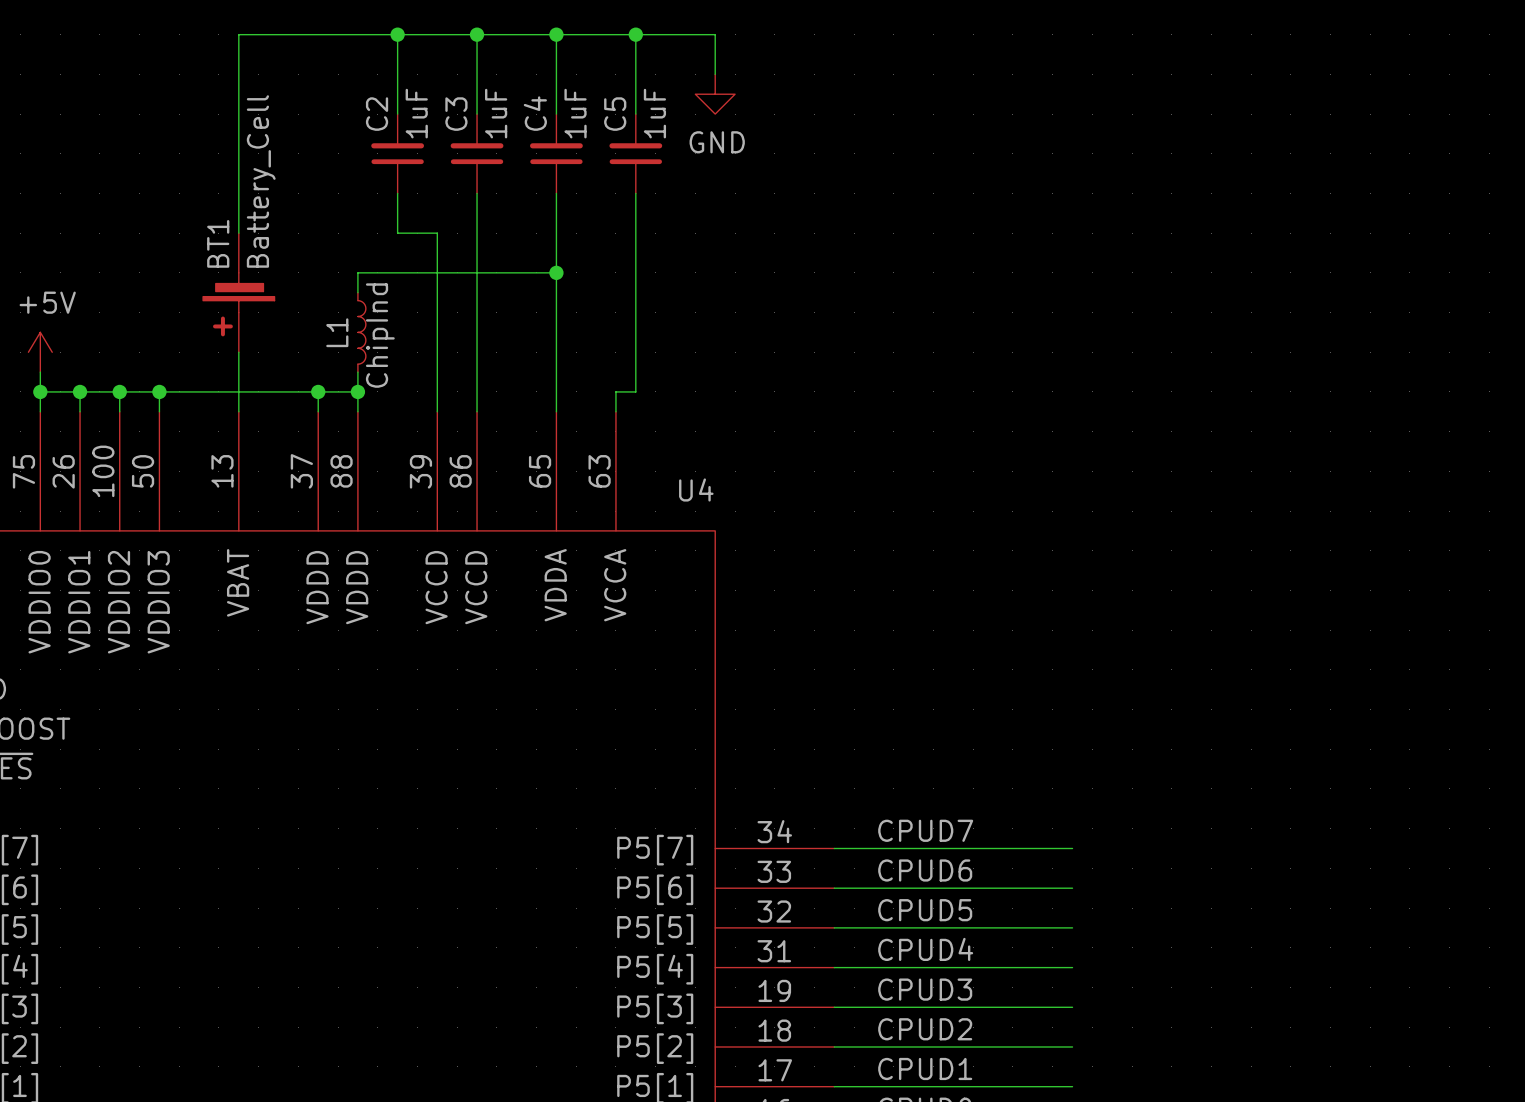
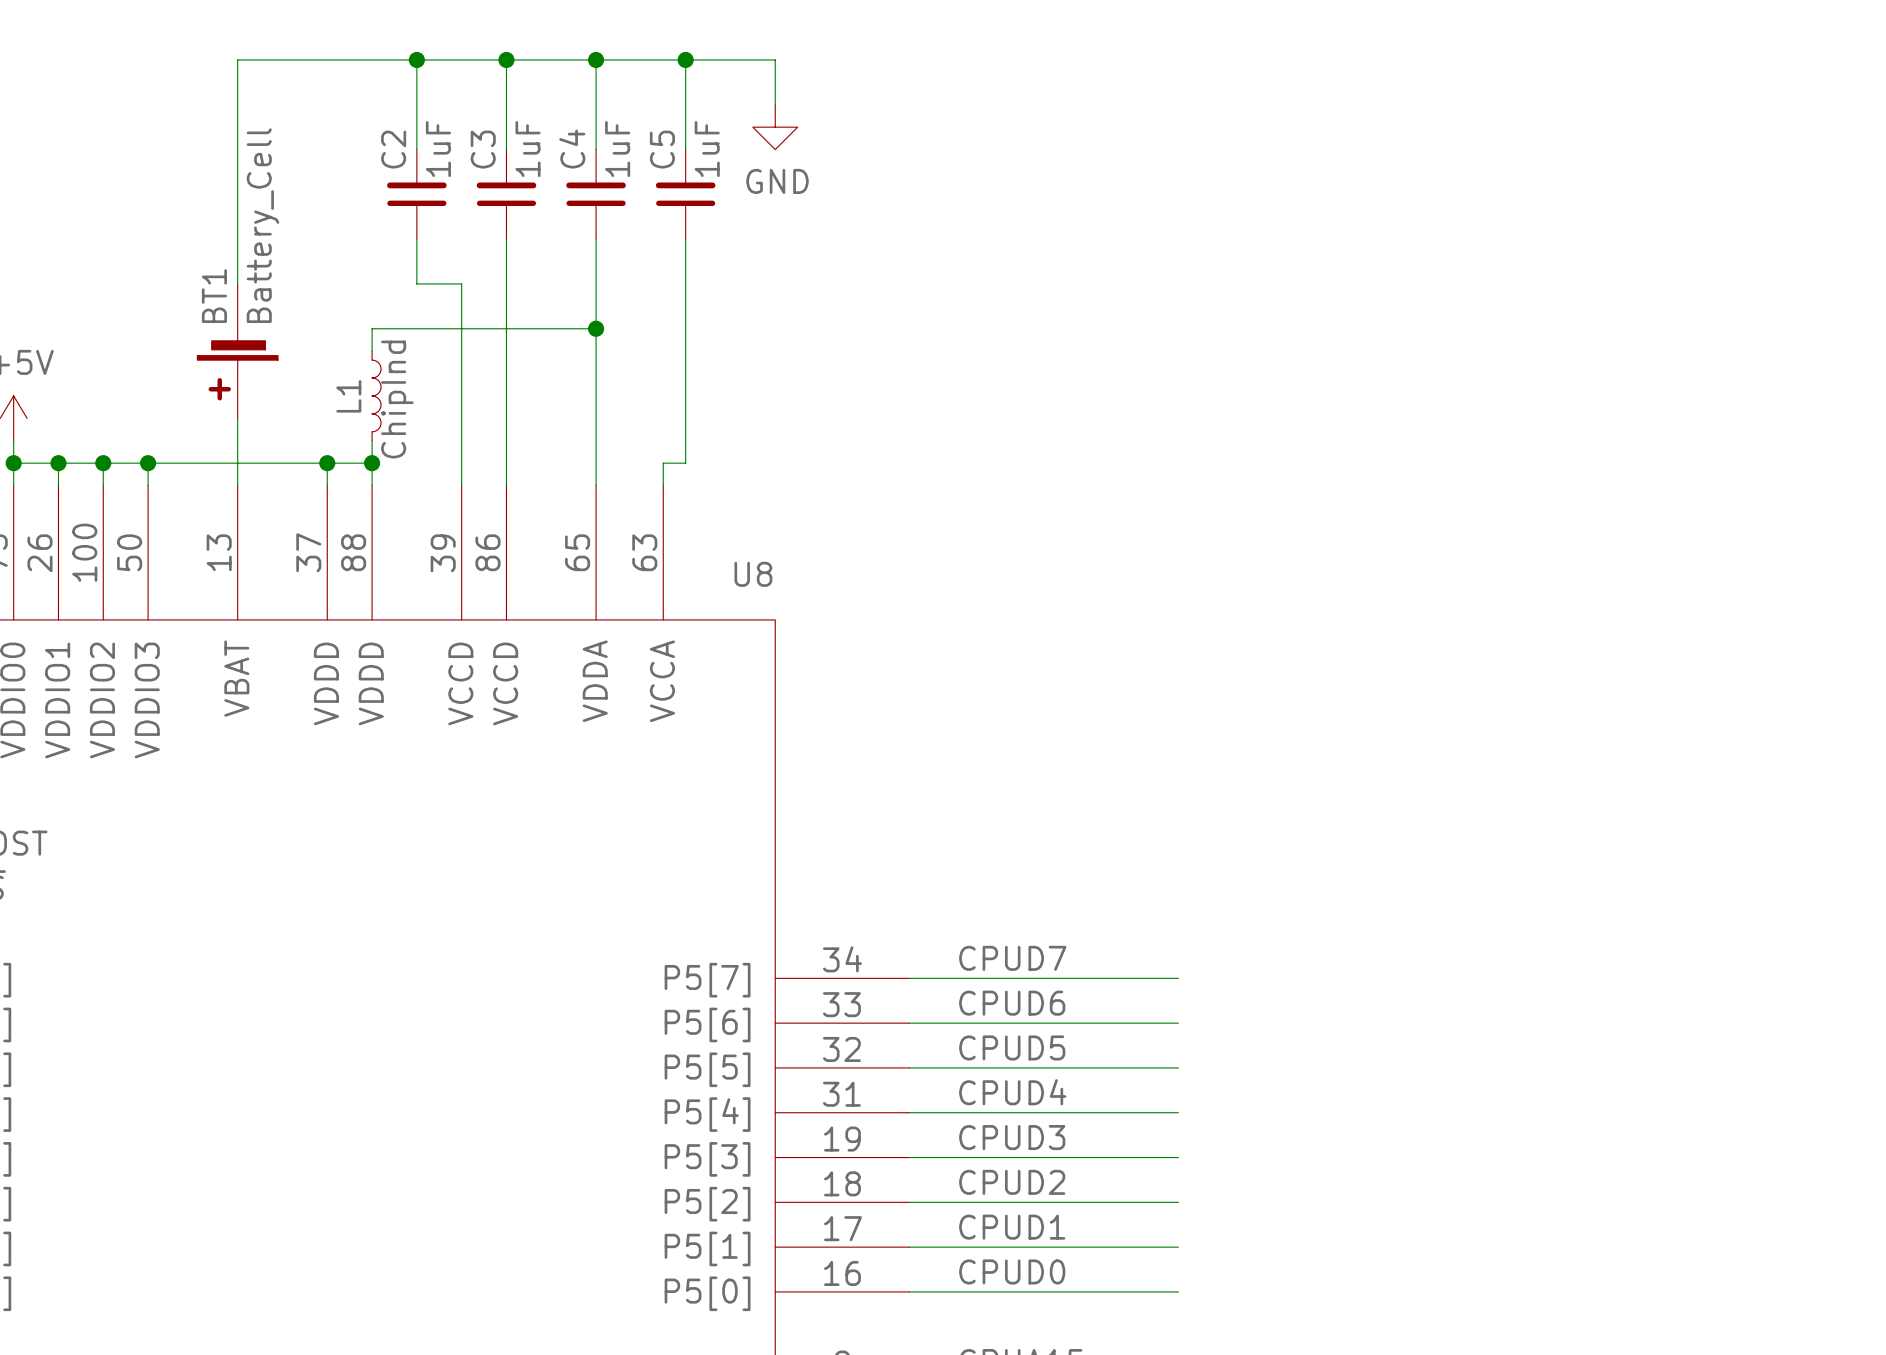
U4 name: U4 (696, 489) -> U8 (753, 574)

